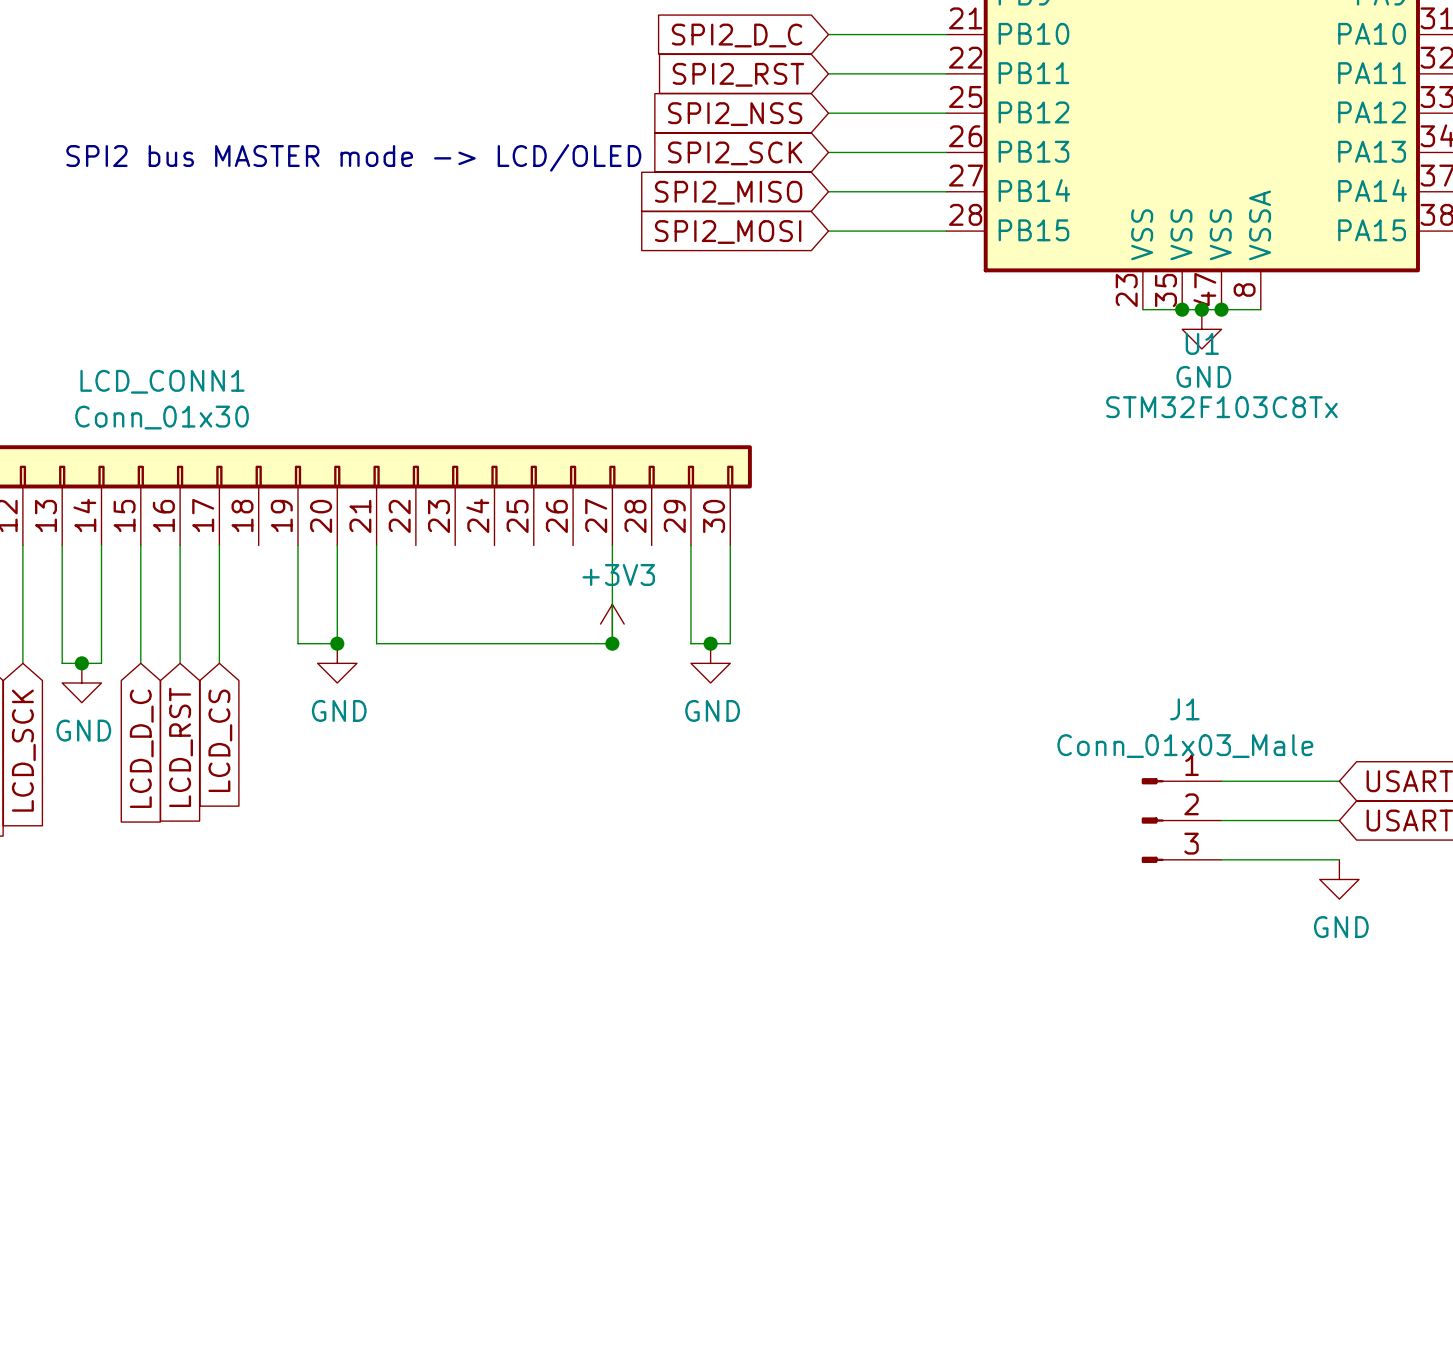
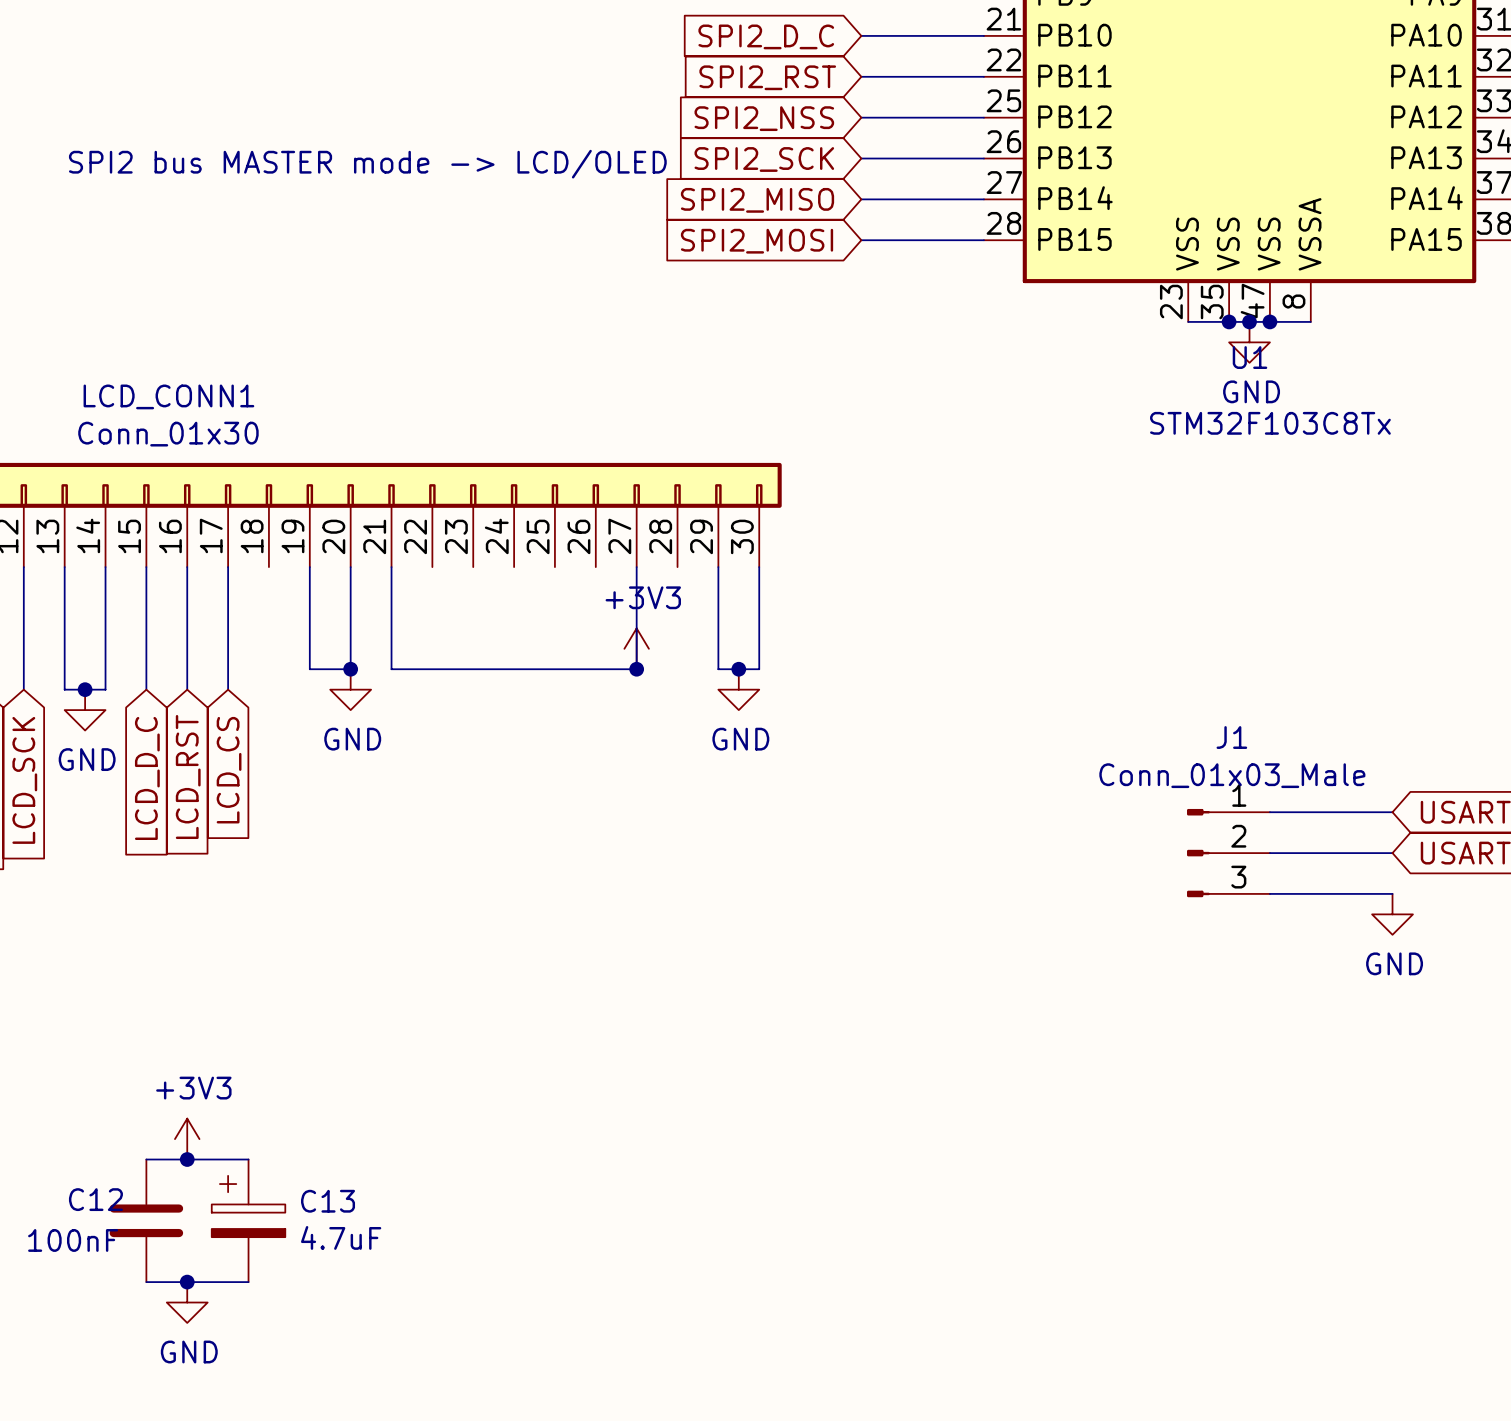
power symbol: none -> +3V3 (187, 1139)
wire: none -> (146, 1159) (248, 1159)
junction: none -> (187, 1159)
C12: none -> 100nF (146, 1220)
C13: none -> 4.7uF (248, 1220)
wire: none -> (146, 1282) (248, 1282)
junction: none -> (187, 1282)
power symbol: none -> GND (187, 1302)

